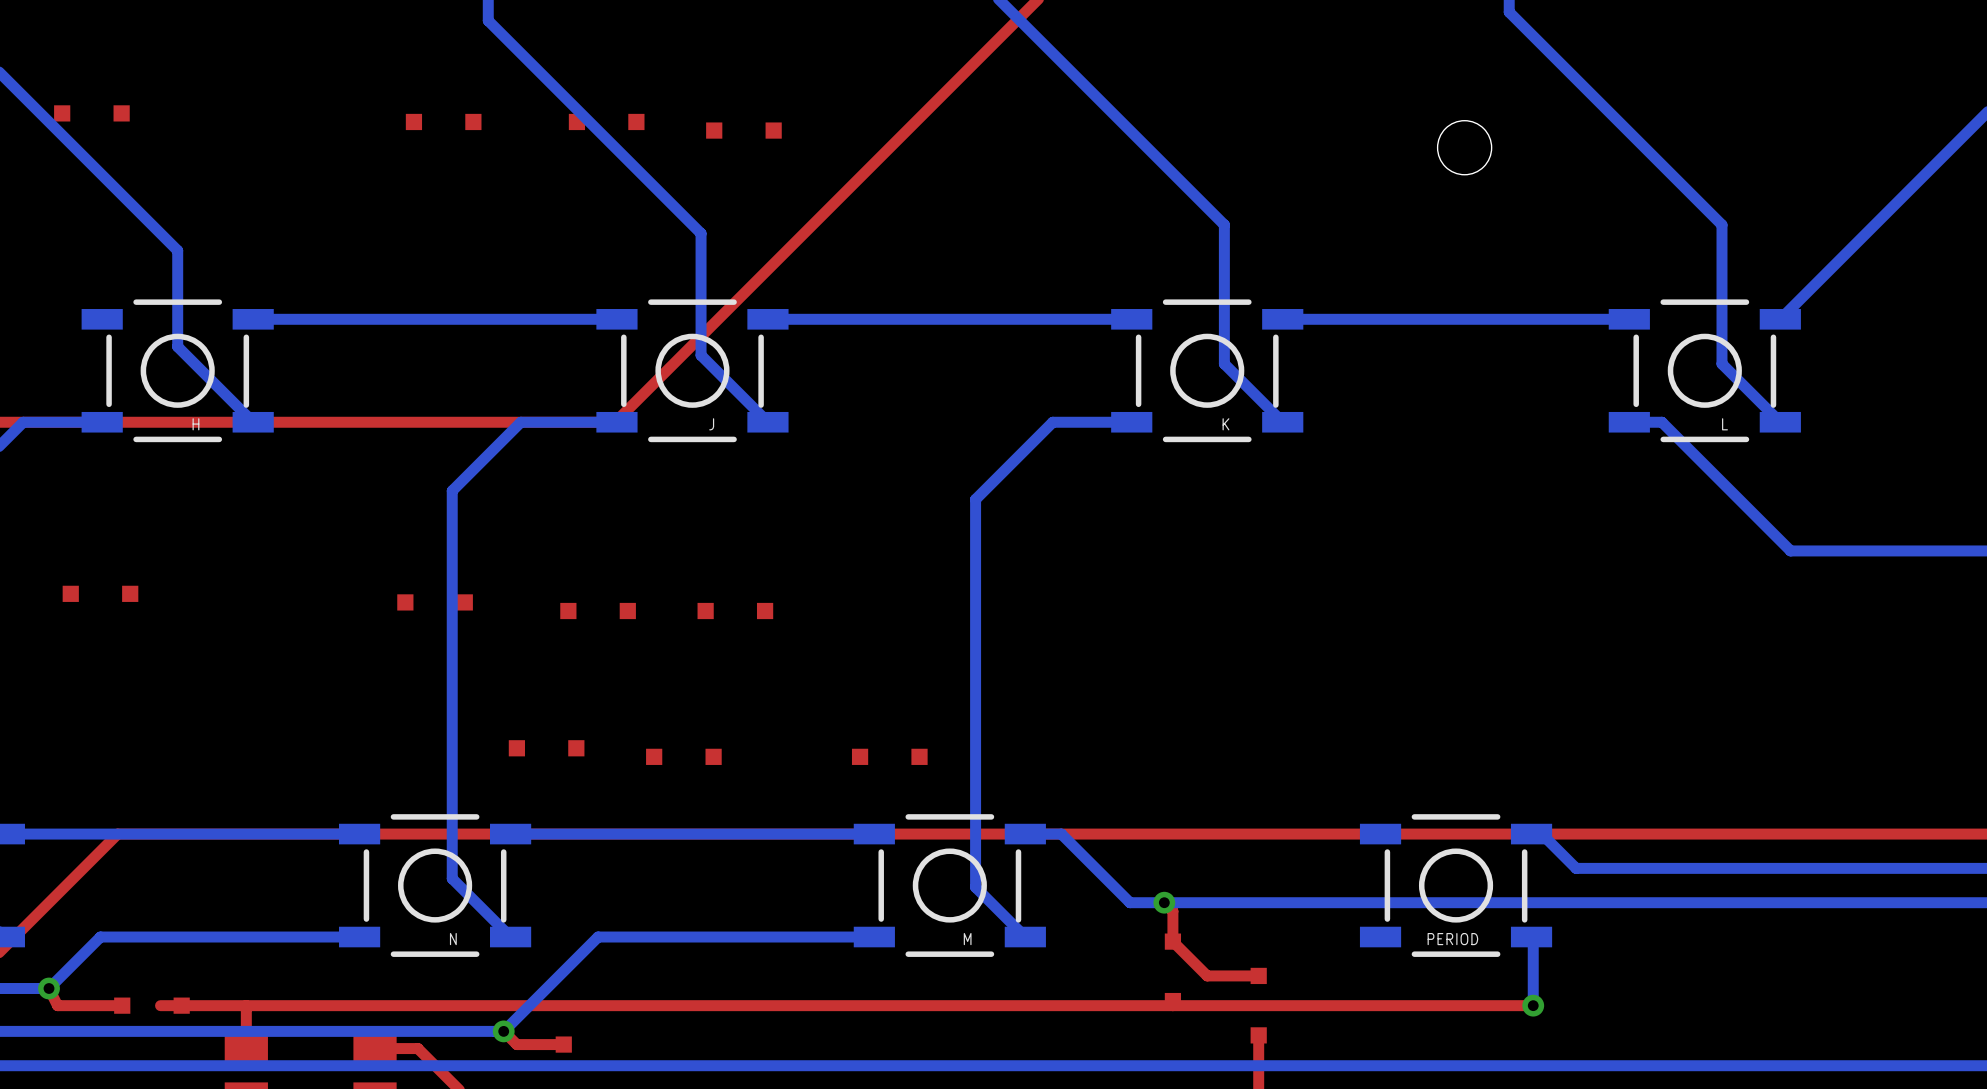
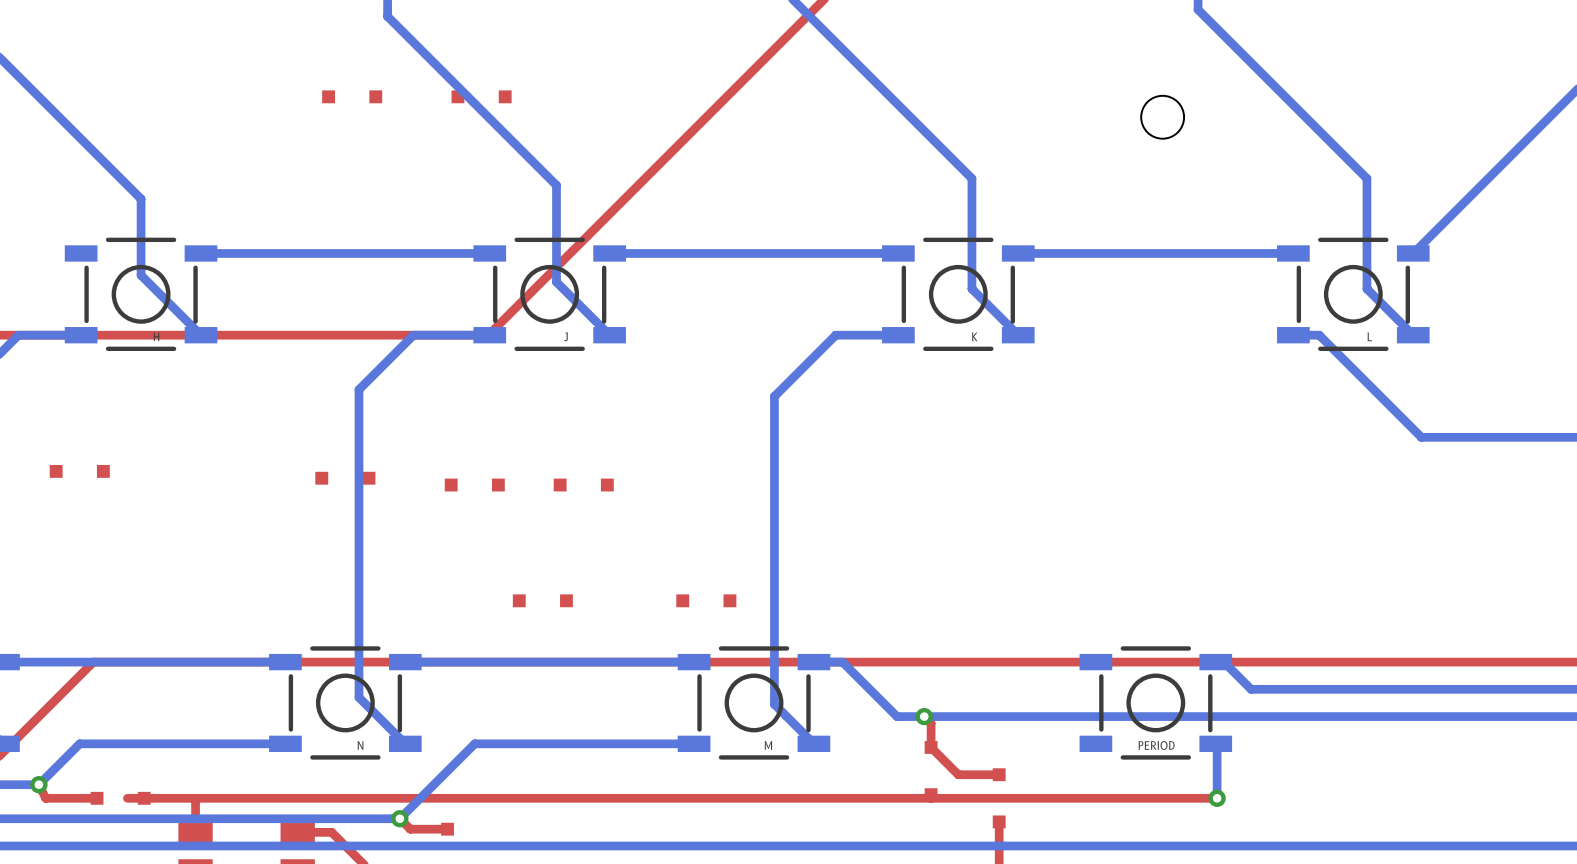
part: (91, 113) -> none
part: (743, 130) -> none
part: (546, 748) -> none

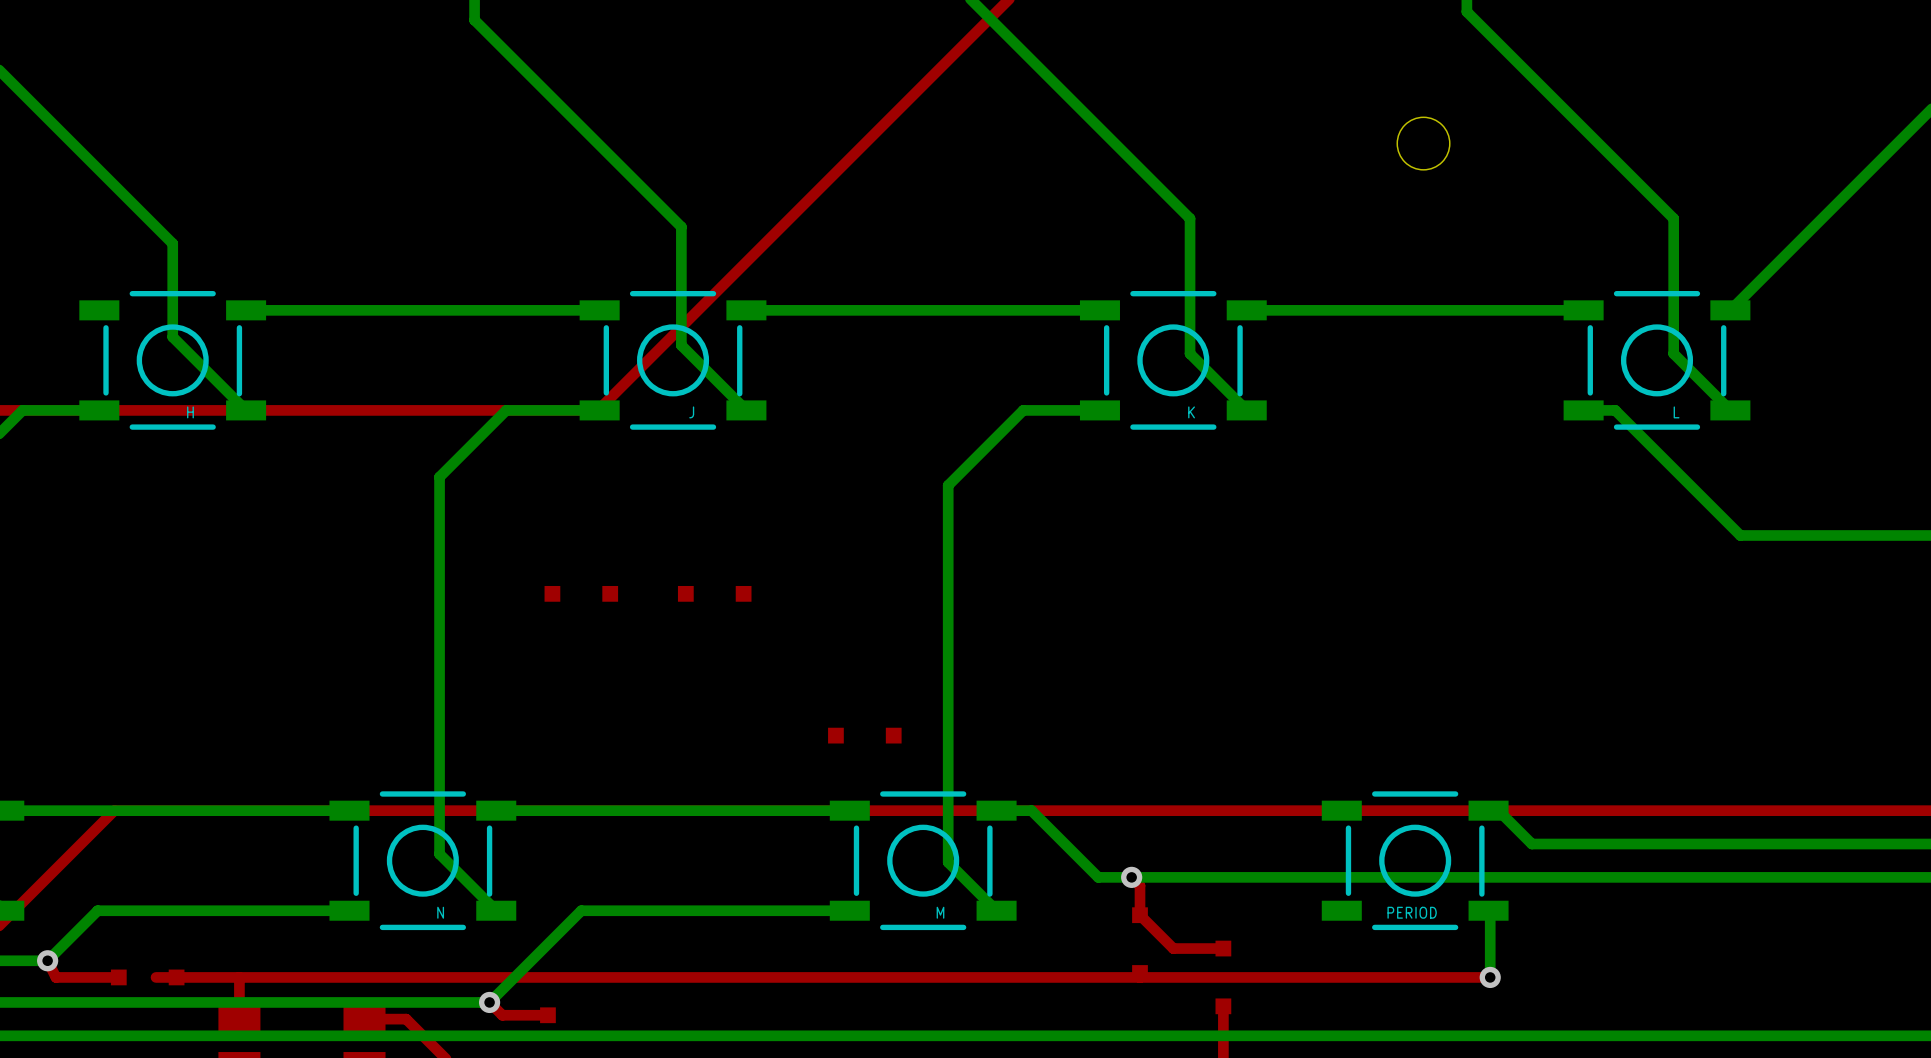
part: (352, 96) -> none
part: (481, 96) -> none
part: (79, 471) -> none
part: (345, 478) -> none
part: (542, 600) -> none

